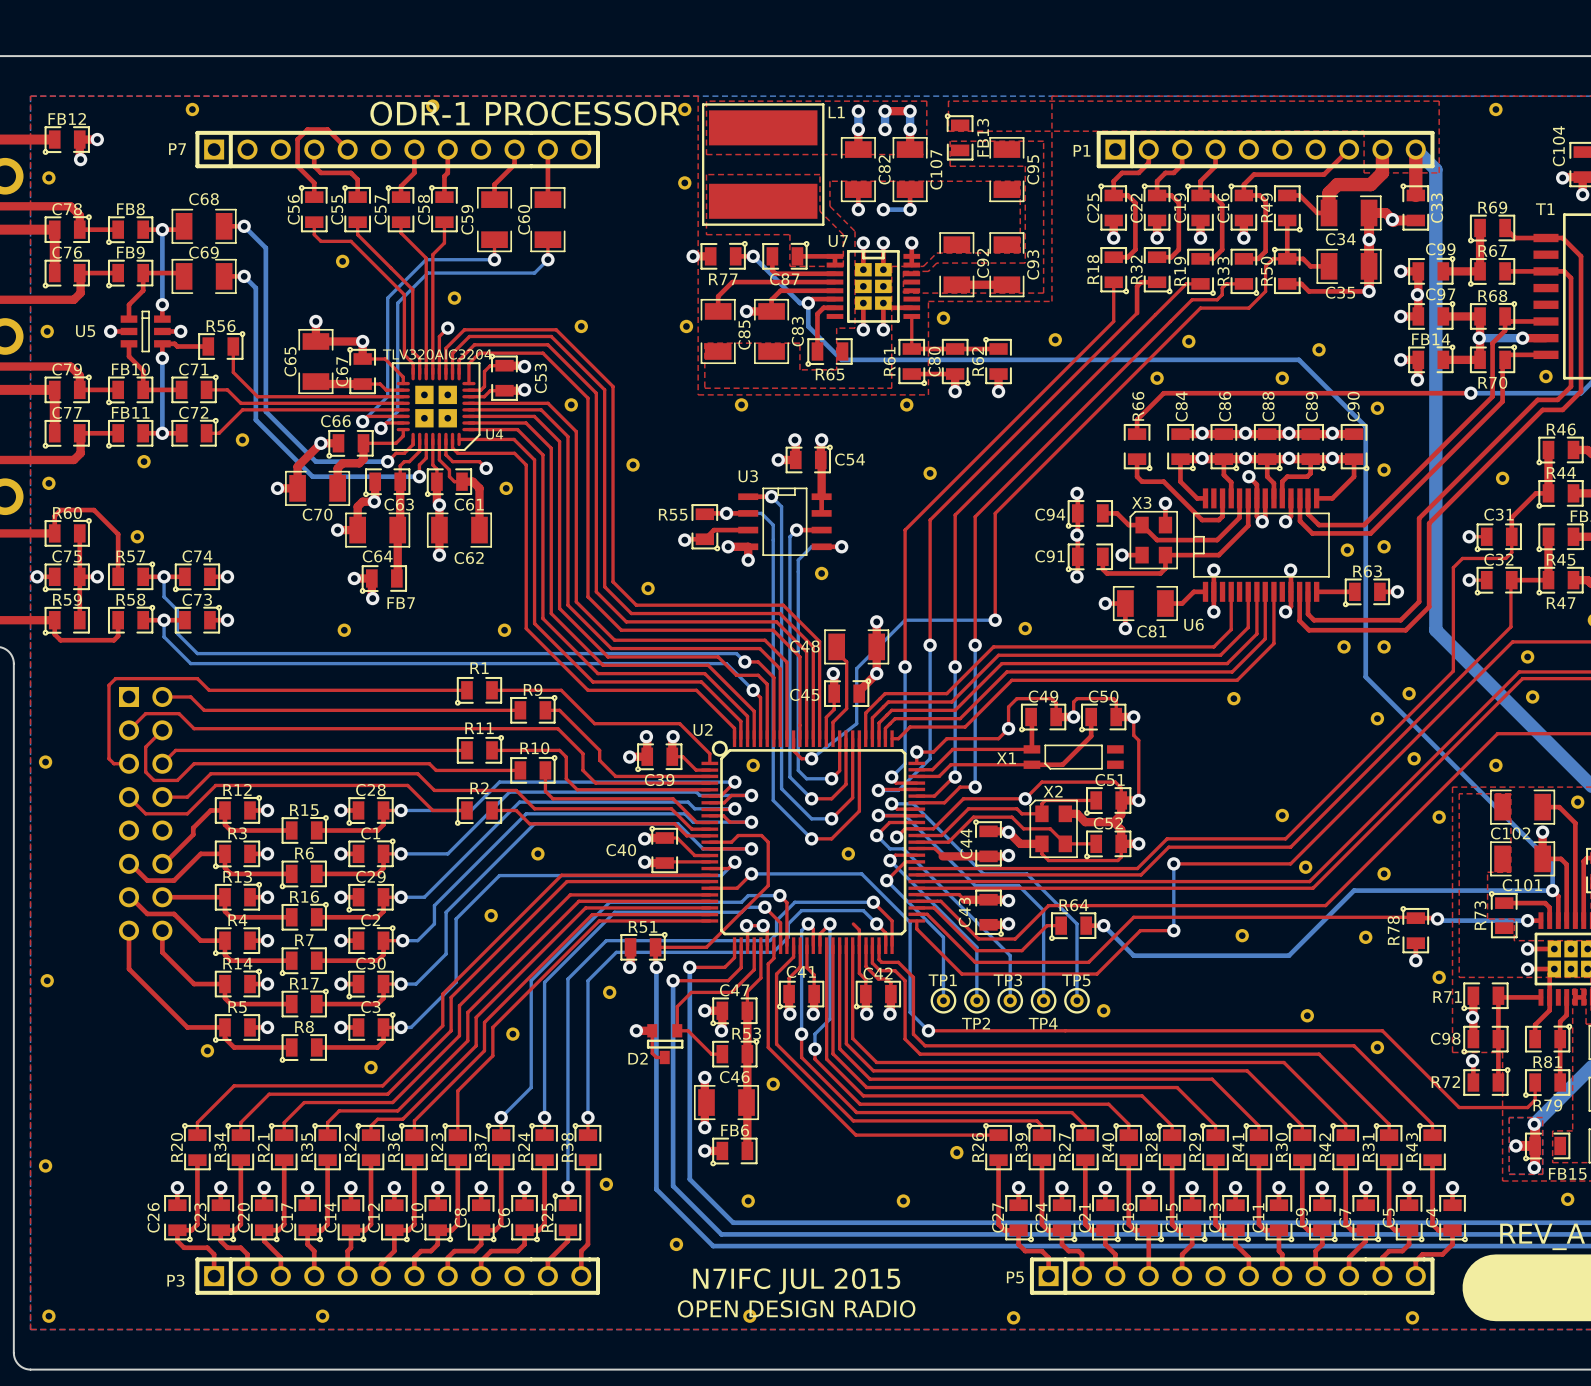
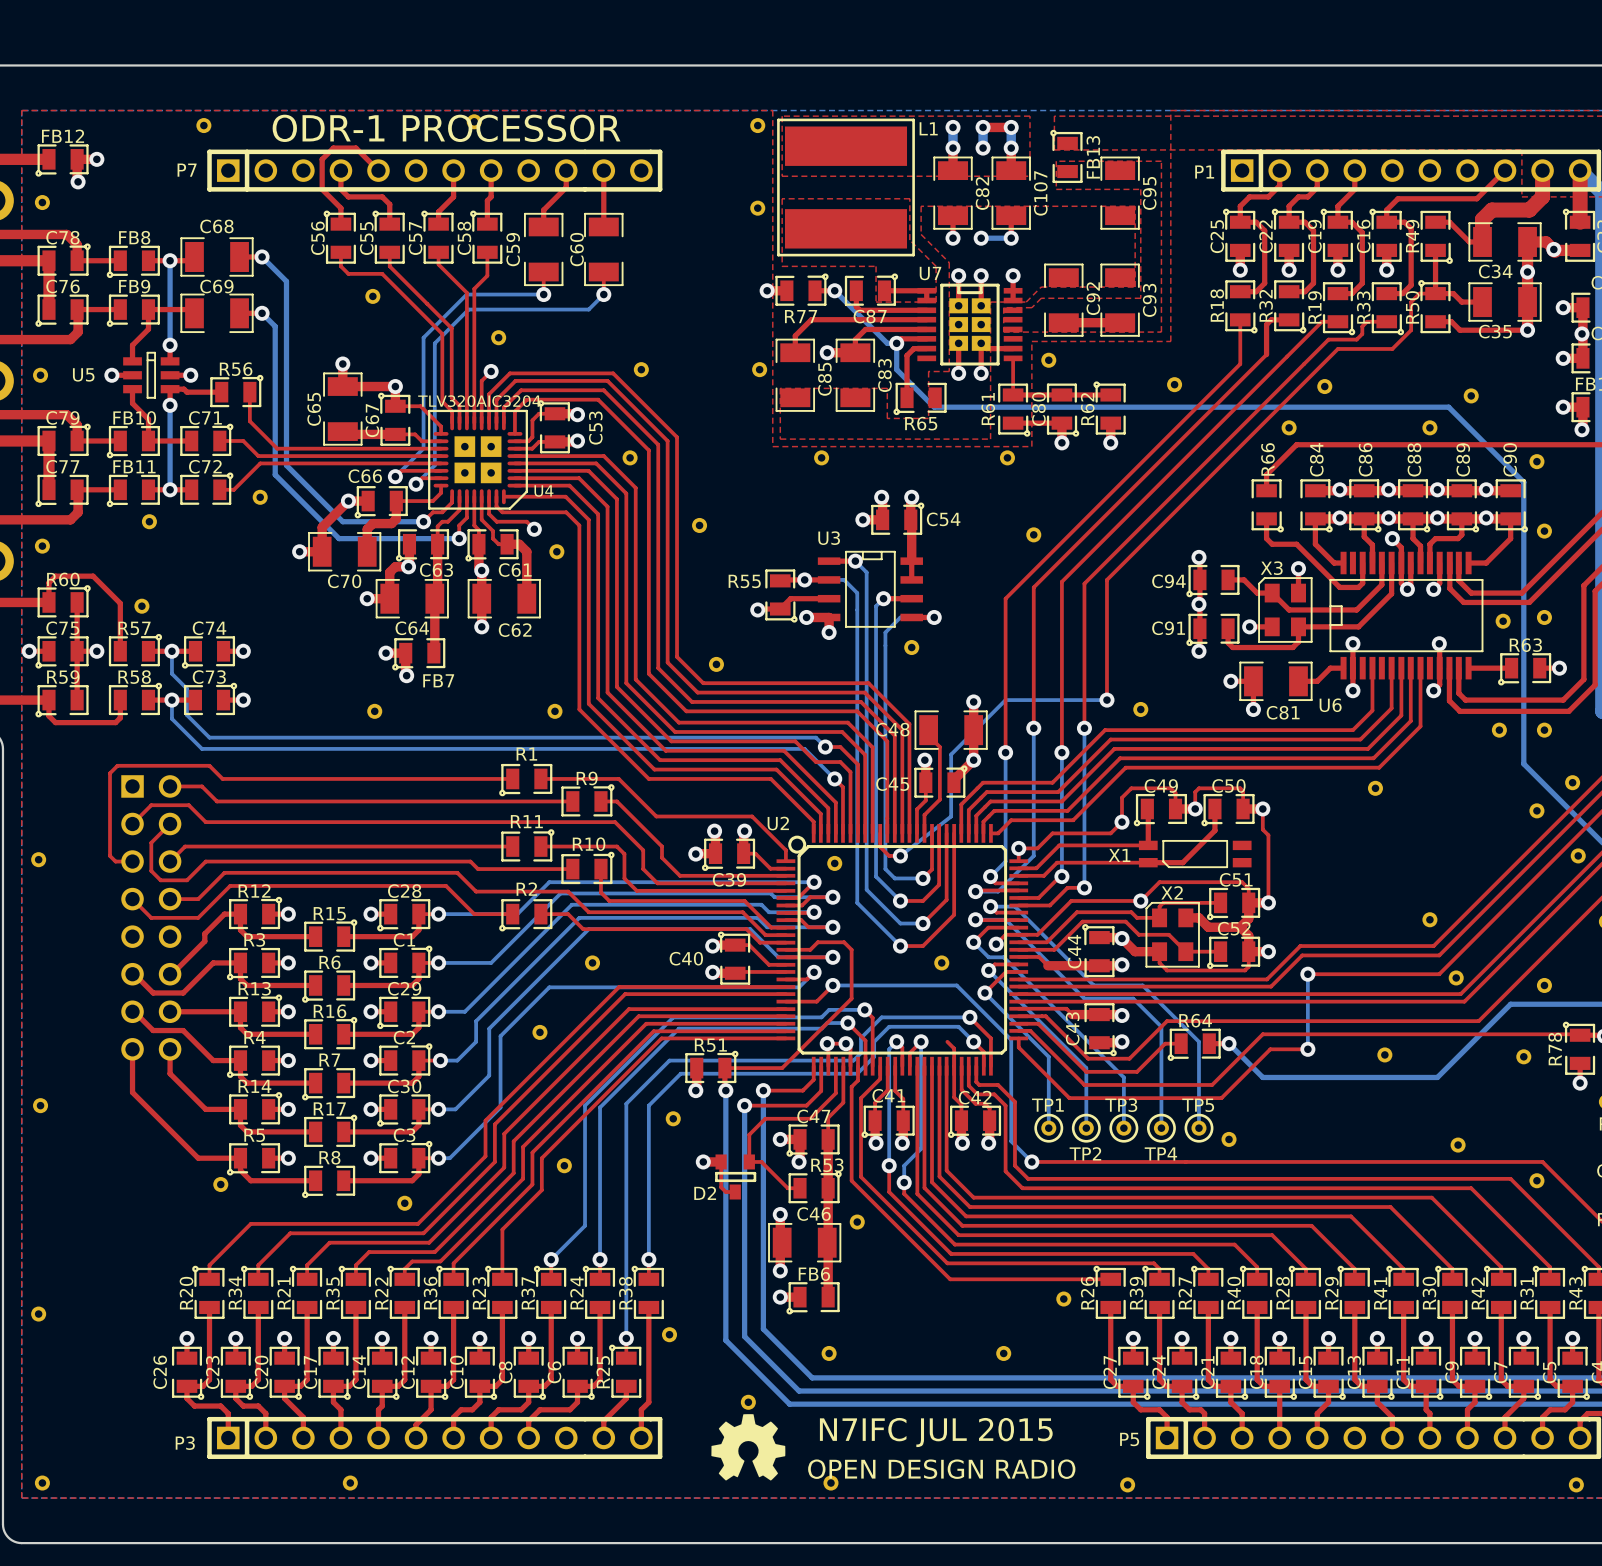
text position: ODR-1 PROCESSOR (525, 113) -> ODR-1 PROCESSOR (446, 128)
drawing: none -> [711, 1414, 786, 1481]
text position: N7IFC JUL 2015 (796, 1281) -> N7IFC JUL 2015 (936, 1432)
text position: OPEN DESIGN RADIO (796, 1308) -> OPEN DESIGN RADIO (941, 1469)

